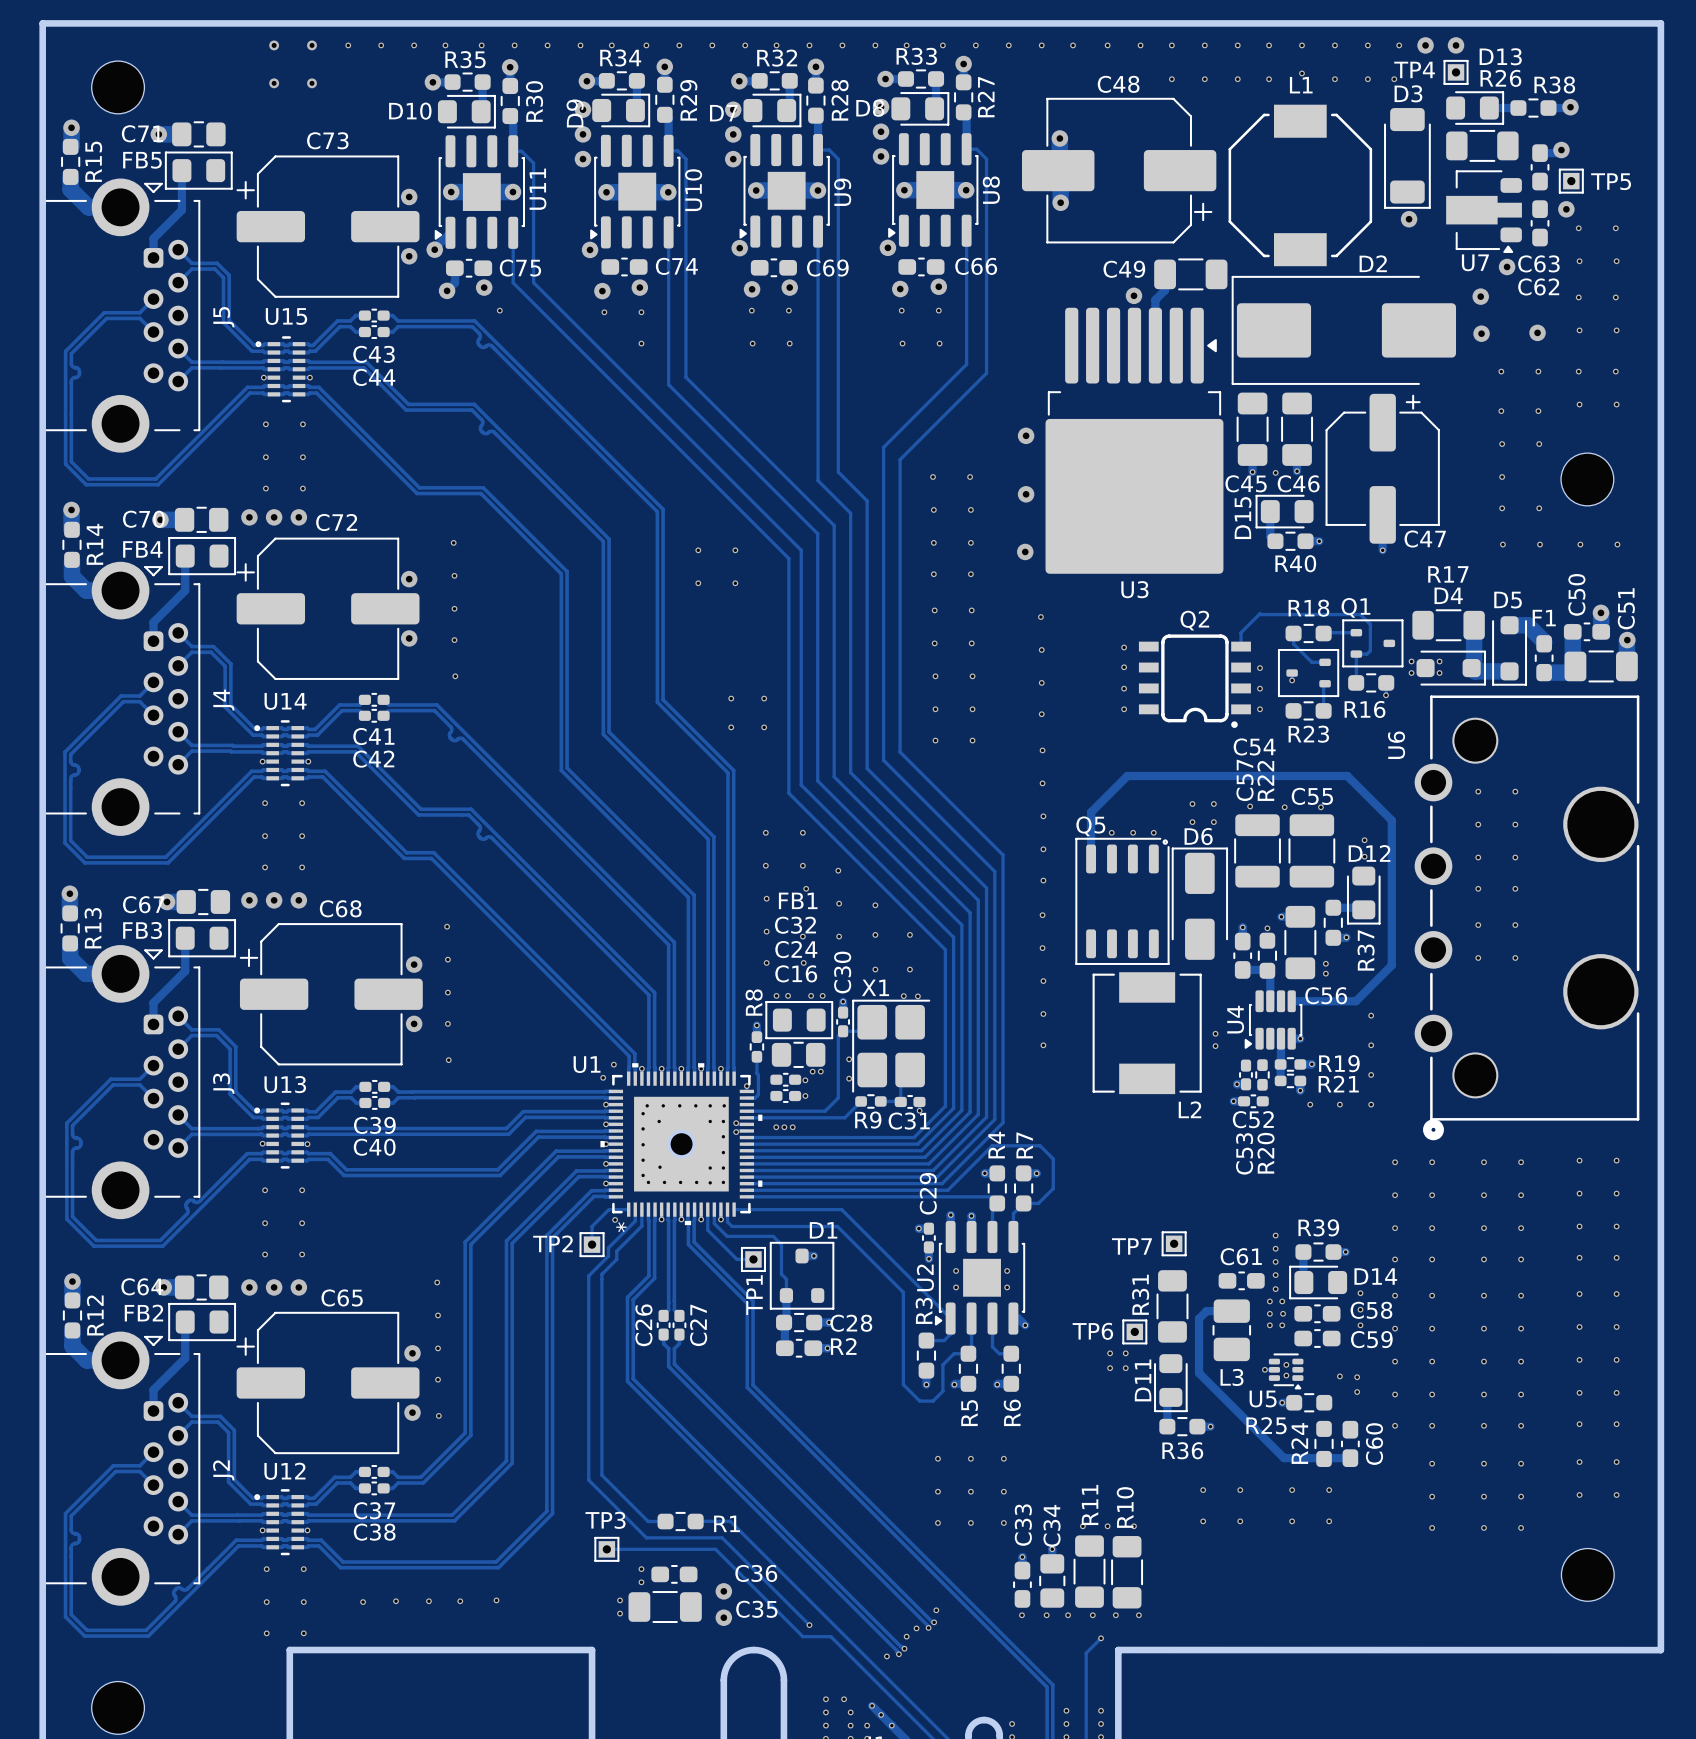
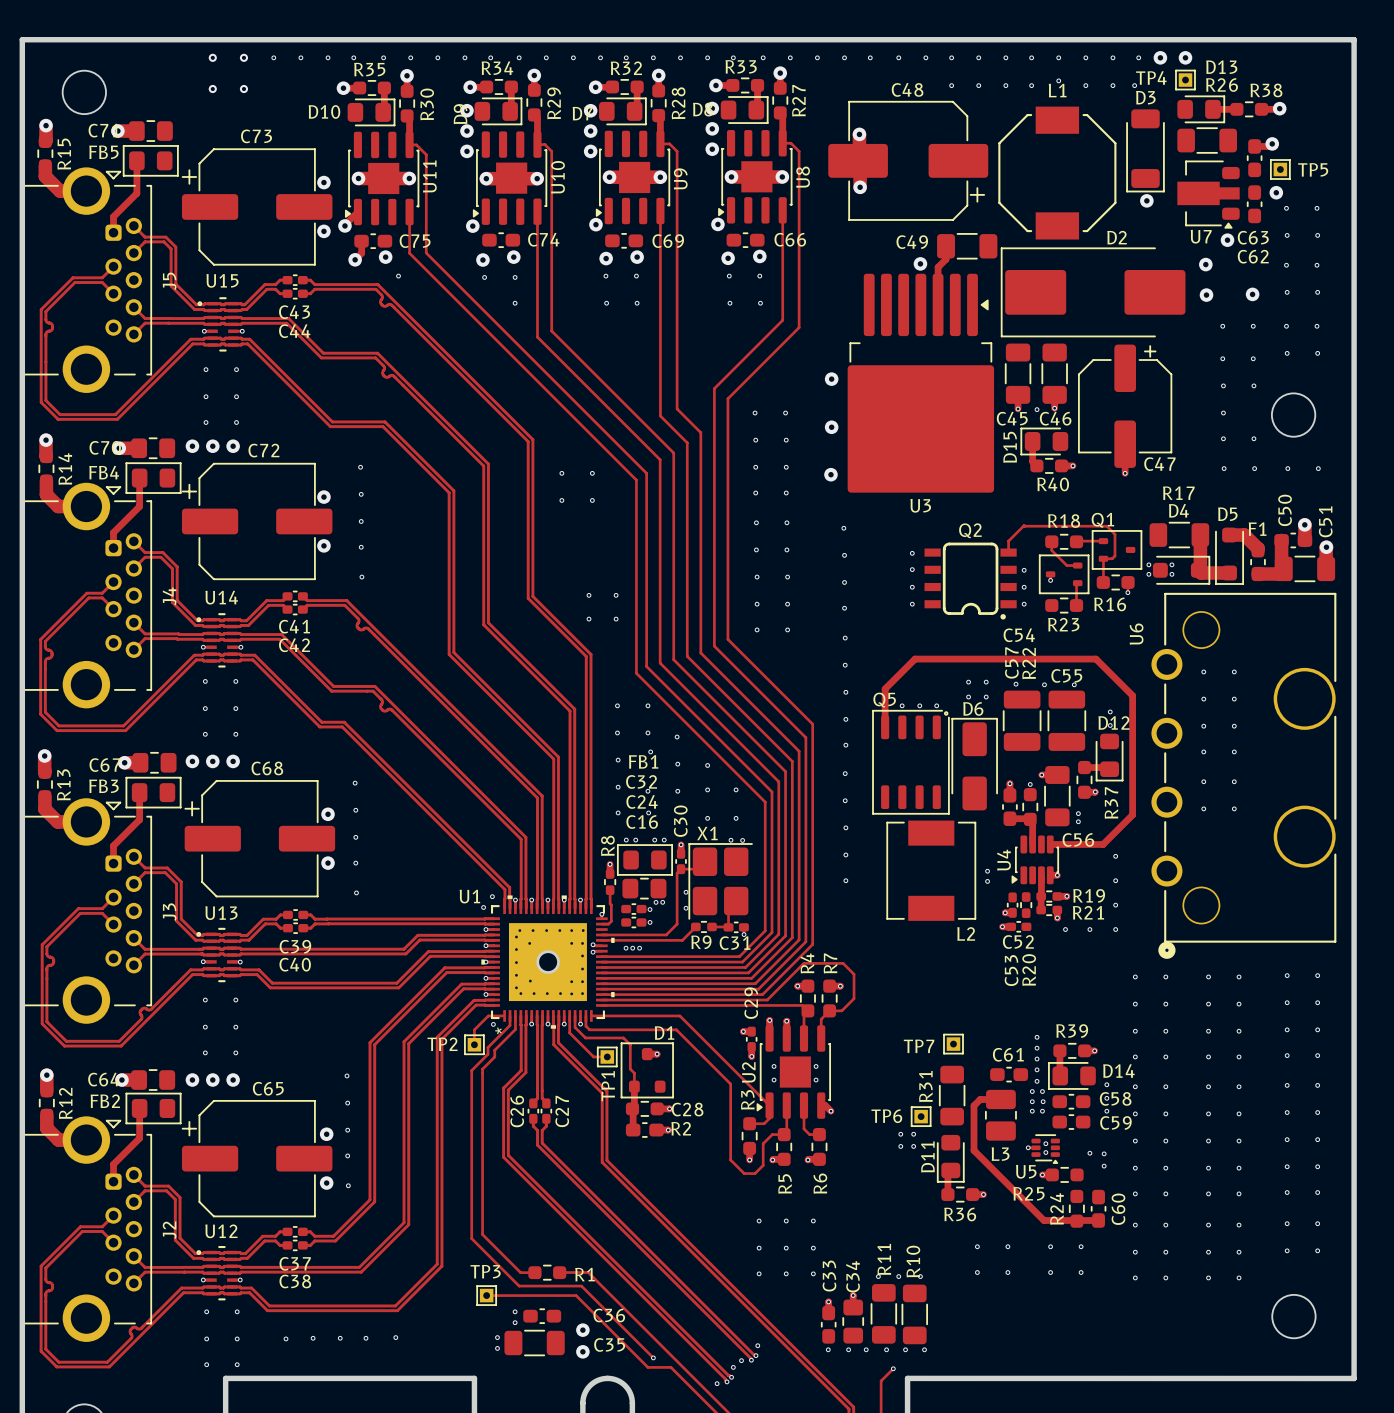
via: none -> (1135, 1225)
via: none -> (1135, 1252)
via: none -> (1135, 1277)

